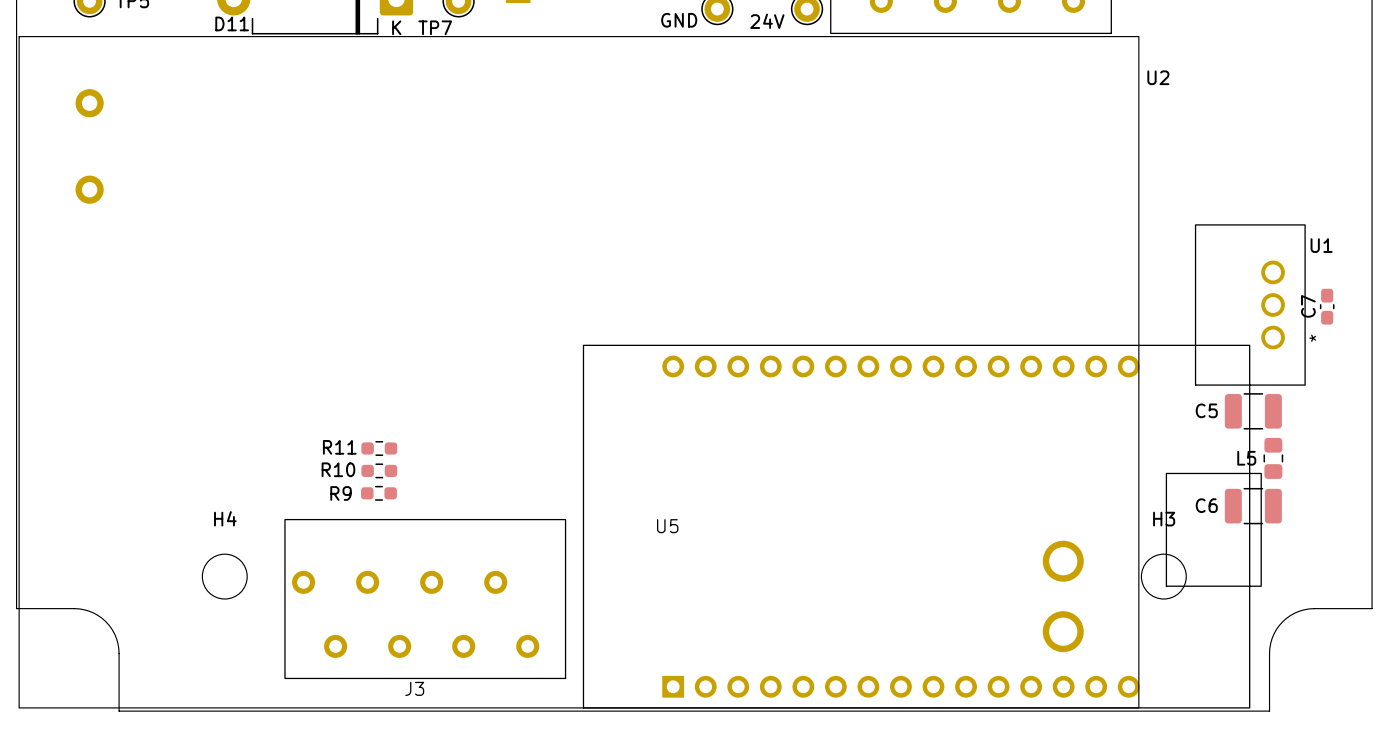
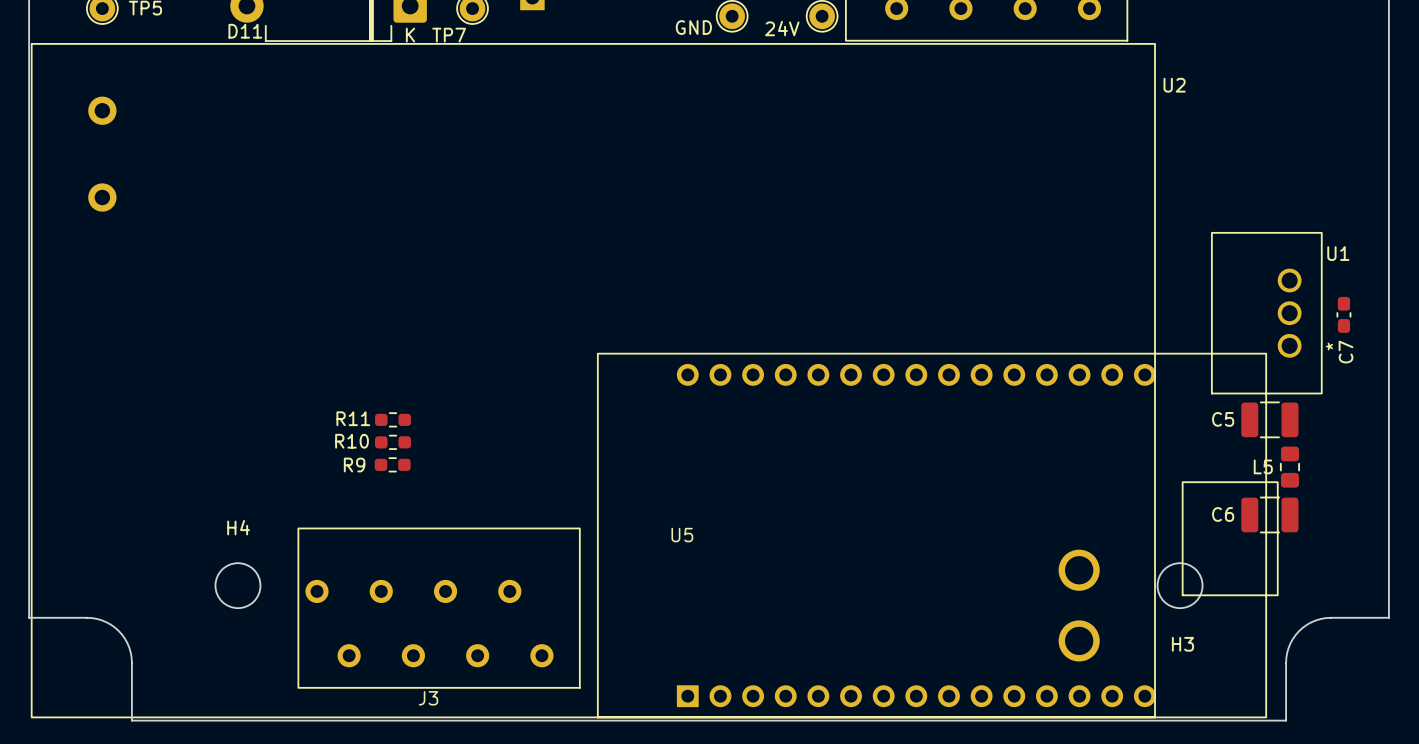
C7 name position: C7 (1308, 306) -> C7 (1346, 352)
R11 position: (379, 448) -> (393, 419)
R10 position: (379, 470) -> (393, 442)
R9 position: (378, 493) -> (392, 464)
H3 name position: H3 (1164, 519) -> H3 (1182, 644)

